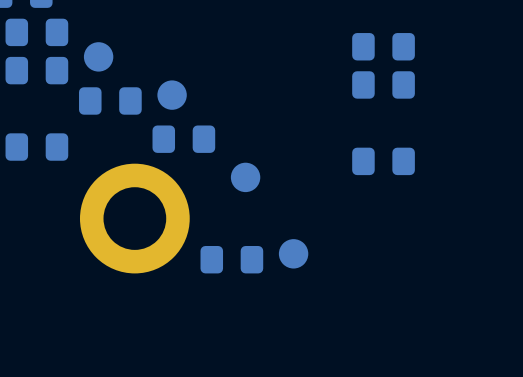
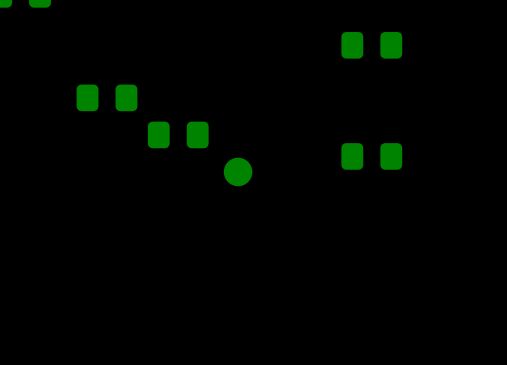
part: (36, 32) -> none
part: (98, 56) -> none
part: (36, 70) -> none
part: (383, 84) -> none
part: (172, 95) -> none
part: (36, 147) -> none
part: (134, 218) -> none
part: (293, 253) -> none
part: (231, 259) -> none

